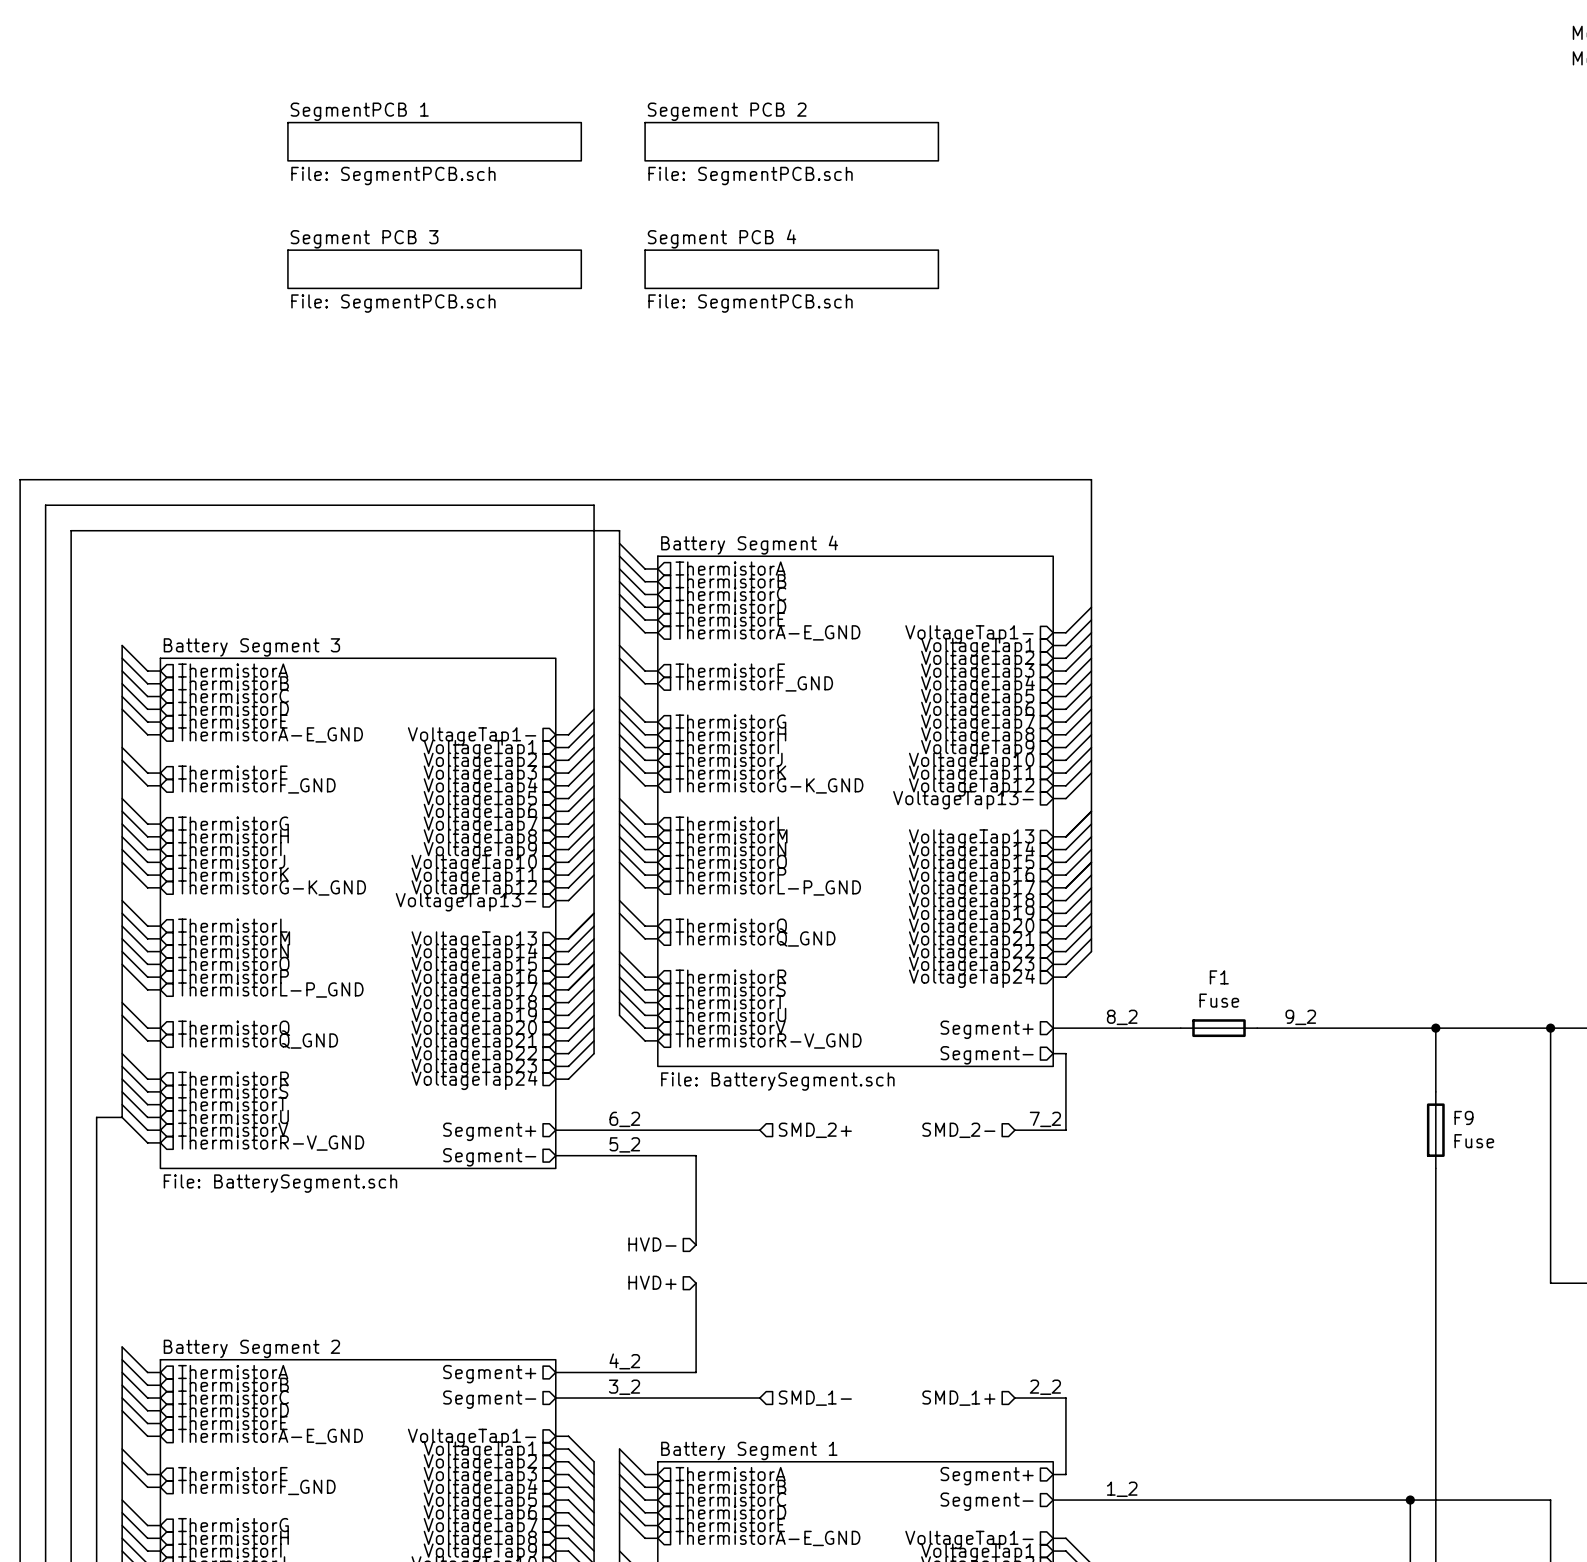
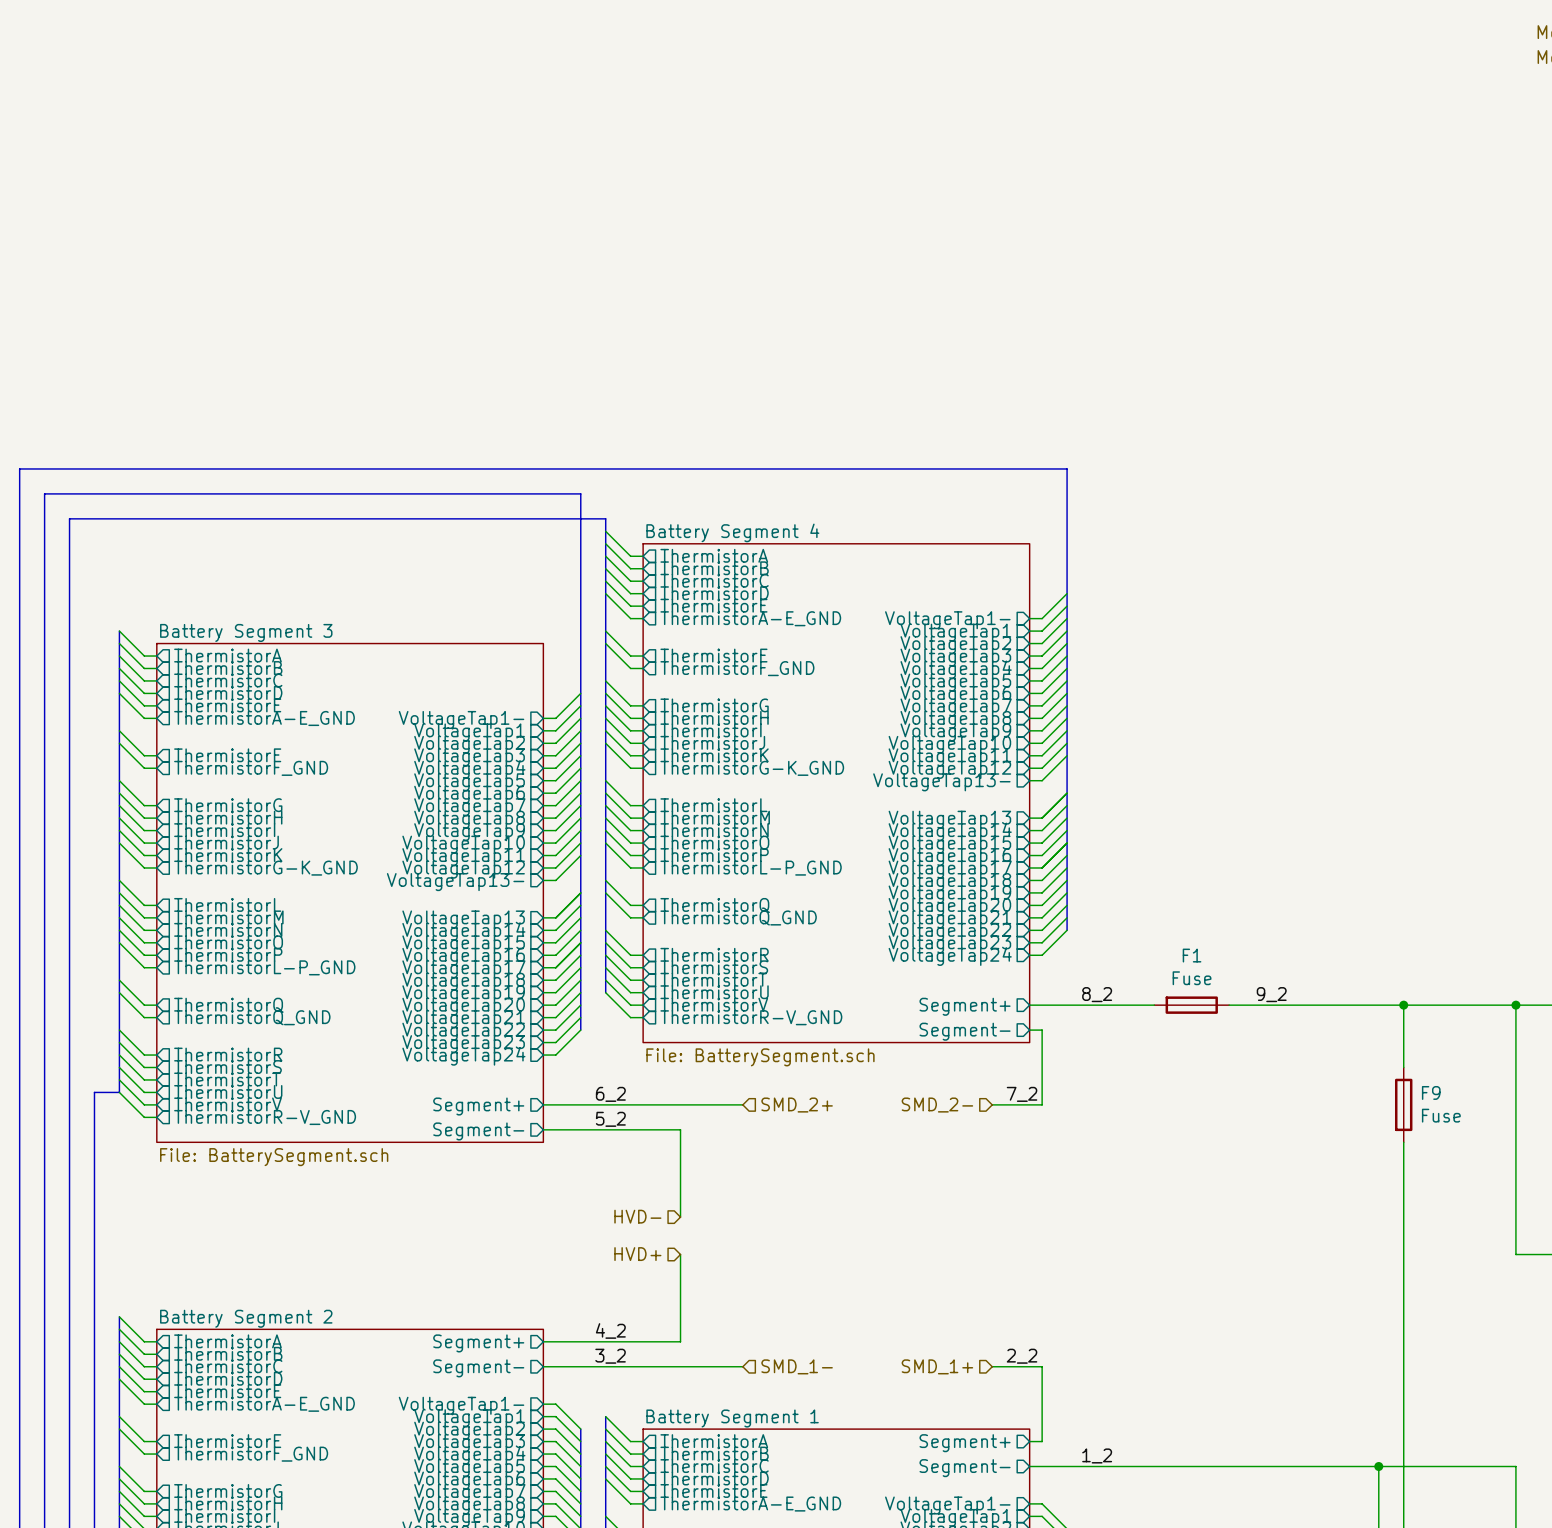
sheet SegmentPCB 1: File: SegmentPCB.sch (434, 141) -> none
sheet Segement PCB 2: File: SegmentPCB.sch (791, 141) -> none
sheet Segment PCB 3: File: SegmentPCB.sch (434, 269) -> none
sheet Segment PCB 4: File: SegmentPCB.sch (791, 269) -> none

